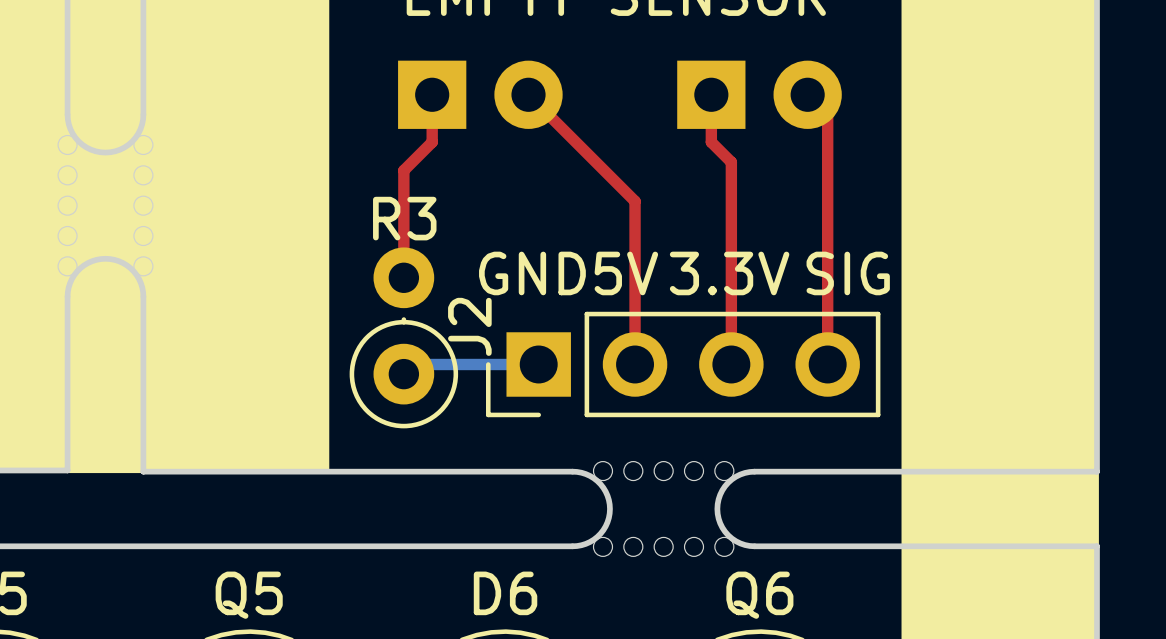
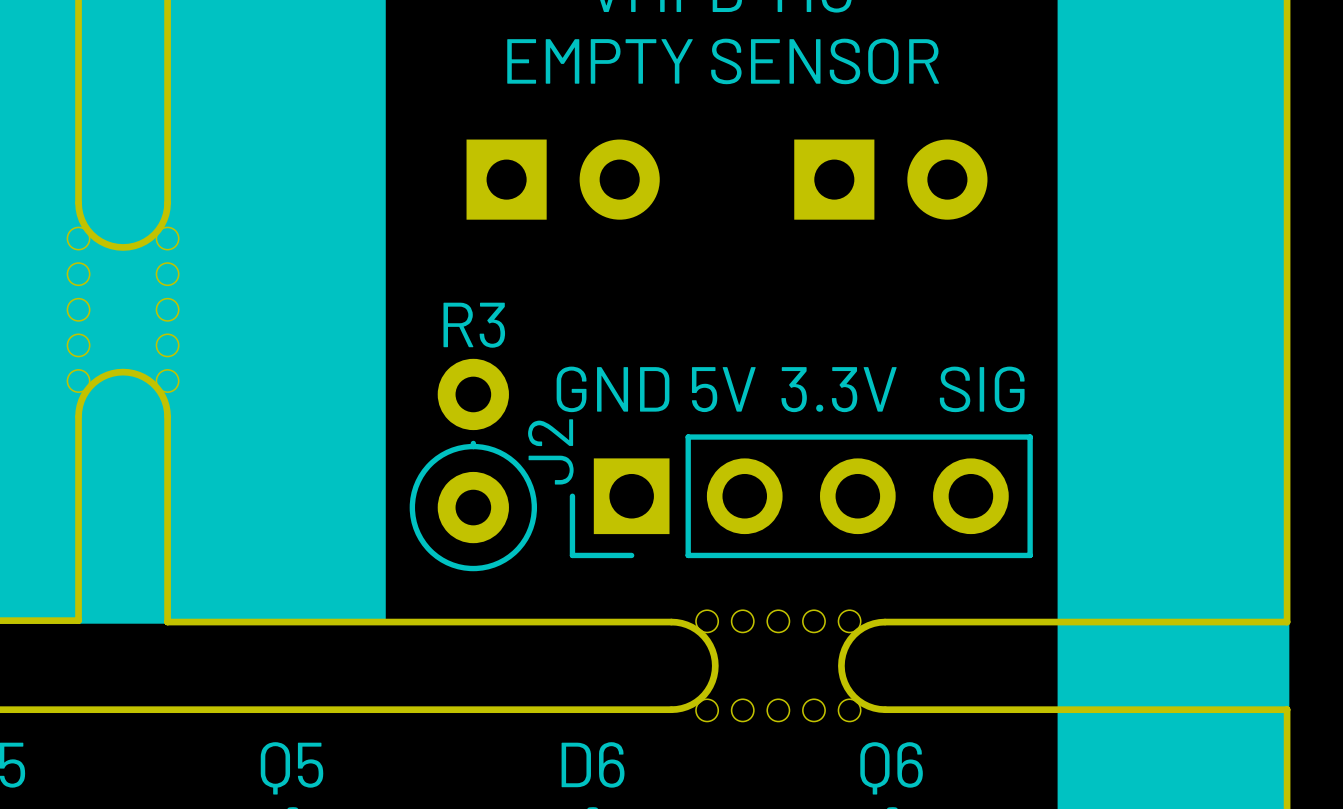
top track: (432, 94) (432, 142) (403, 170) (403, 277) -> none
top track: (528, 94) (635, 201) (635, 364) -> none
top track: (711, 94) (711, 142) (731, 162) (731, 364) -> none
top track: (807, 94) (827, 114) (827, 364) -> none
bottom track: (538, 364) (413, 364) (403, 374) -> none

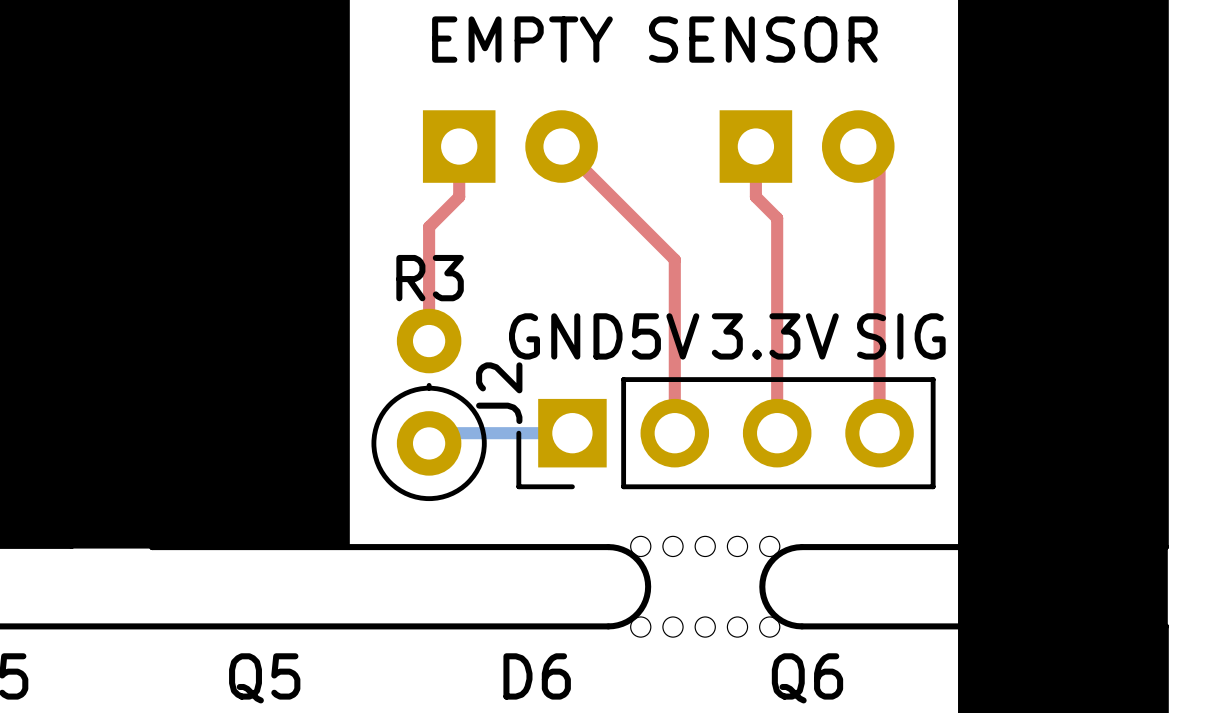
top track: none -> (459, 146) (459, 196) (429, 227) (429, 341)
top track: none -> (561, 146) (674, 259) (674, 433)
top track: none -> (755, 146) (755, 196) (777, 218) (777, 433)
top track: none -> (858, 146) (879, 167) (879, 433)
bottom track: none -> (572, 433) (439, 433) (429, 443)

